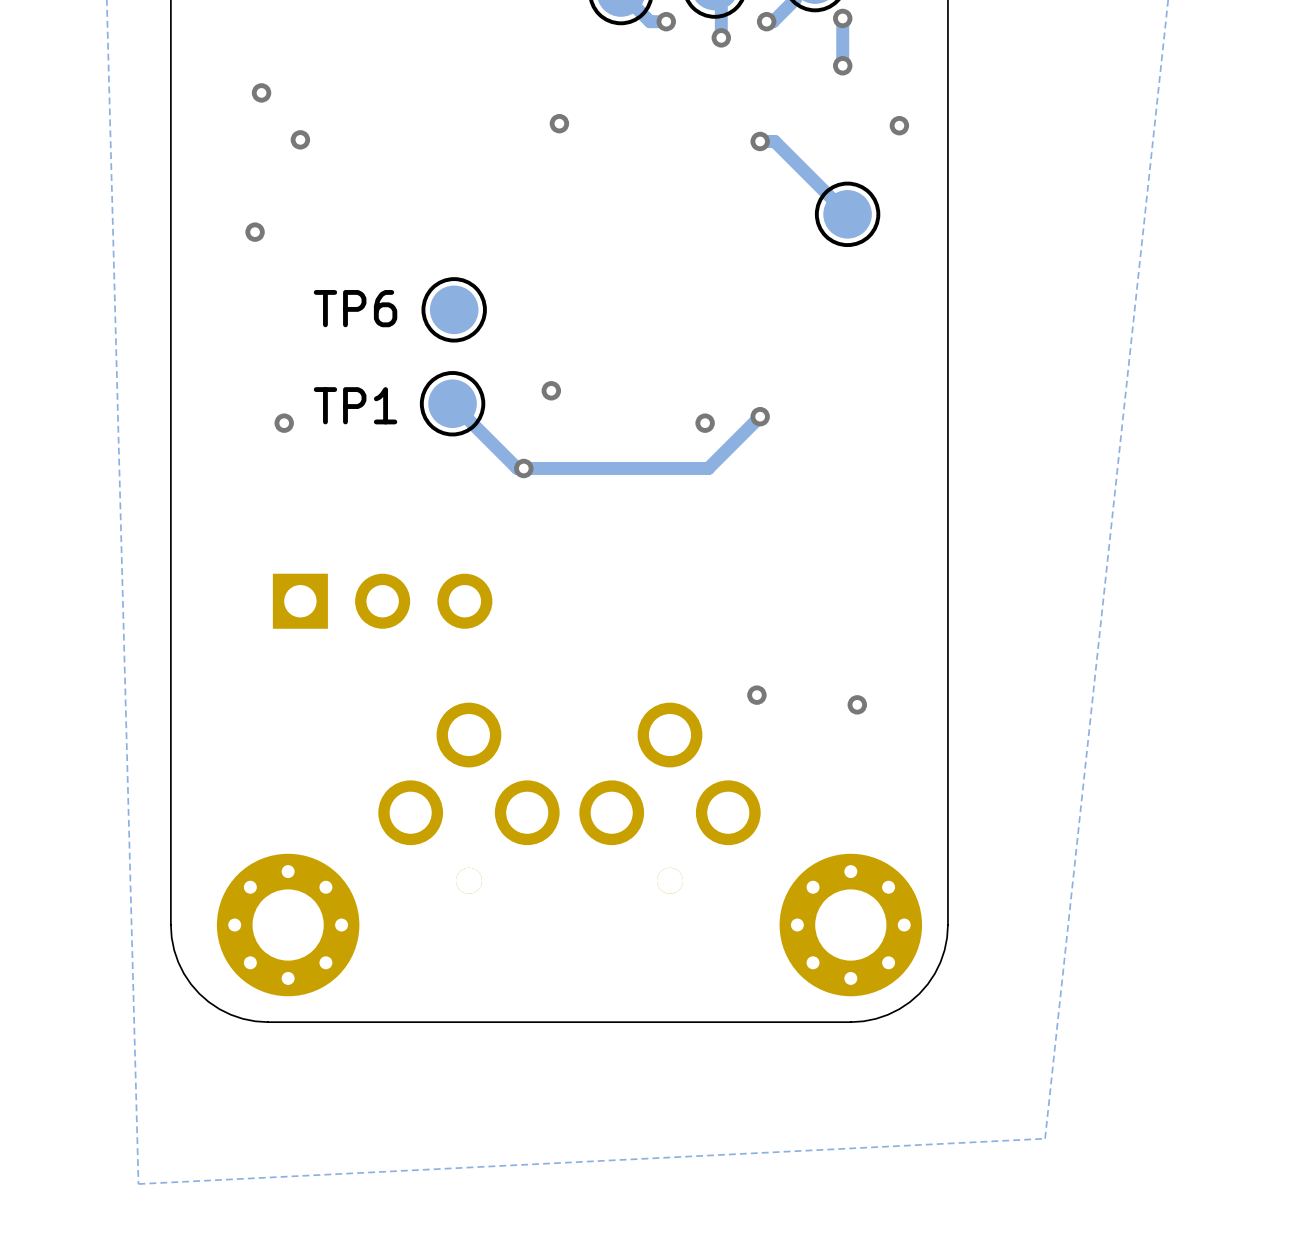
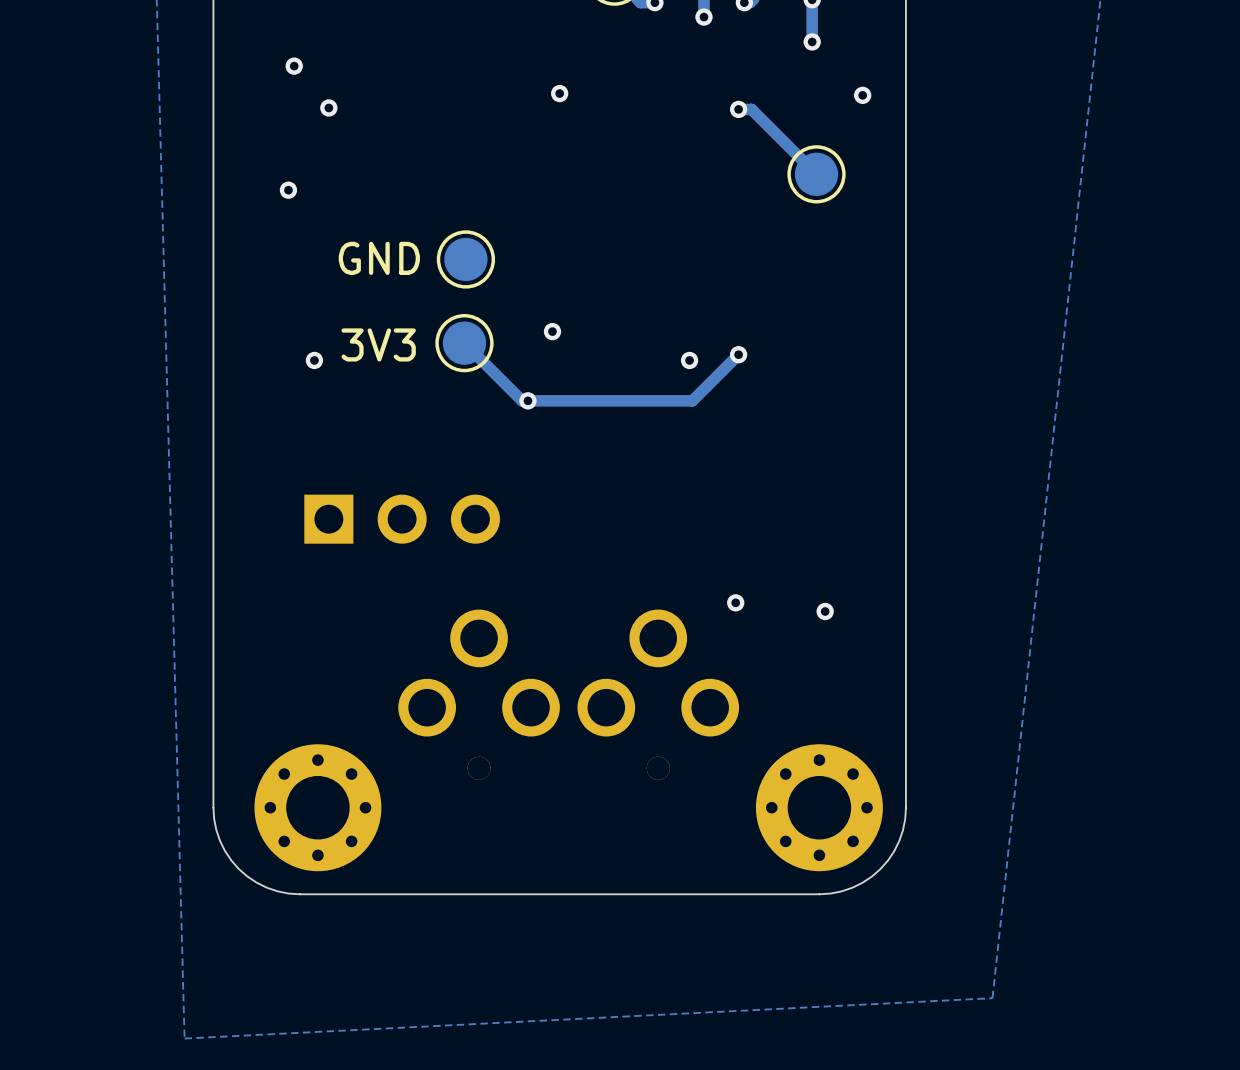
TP6 name: TP6 (355, 308) -> GND (379, 258)
TP1 name: TP1 (355, 405) -> 3V3 (378, 344)

